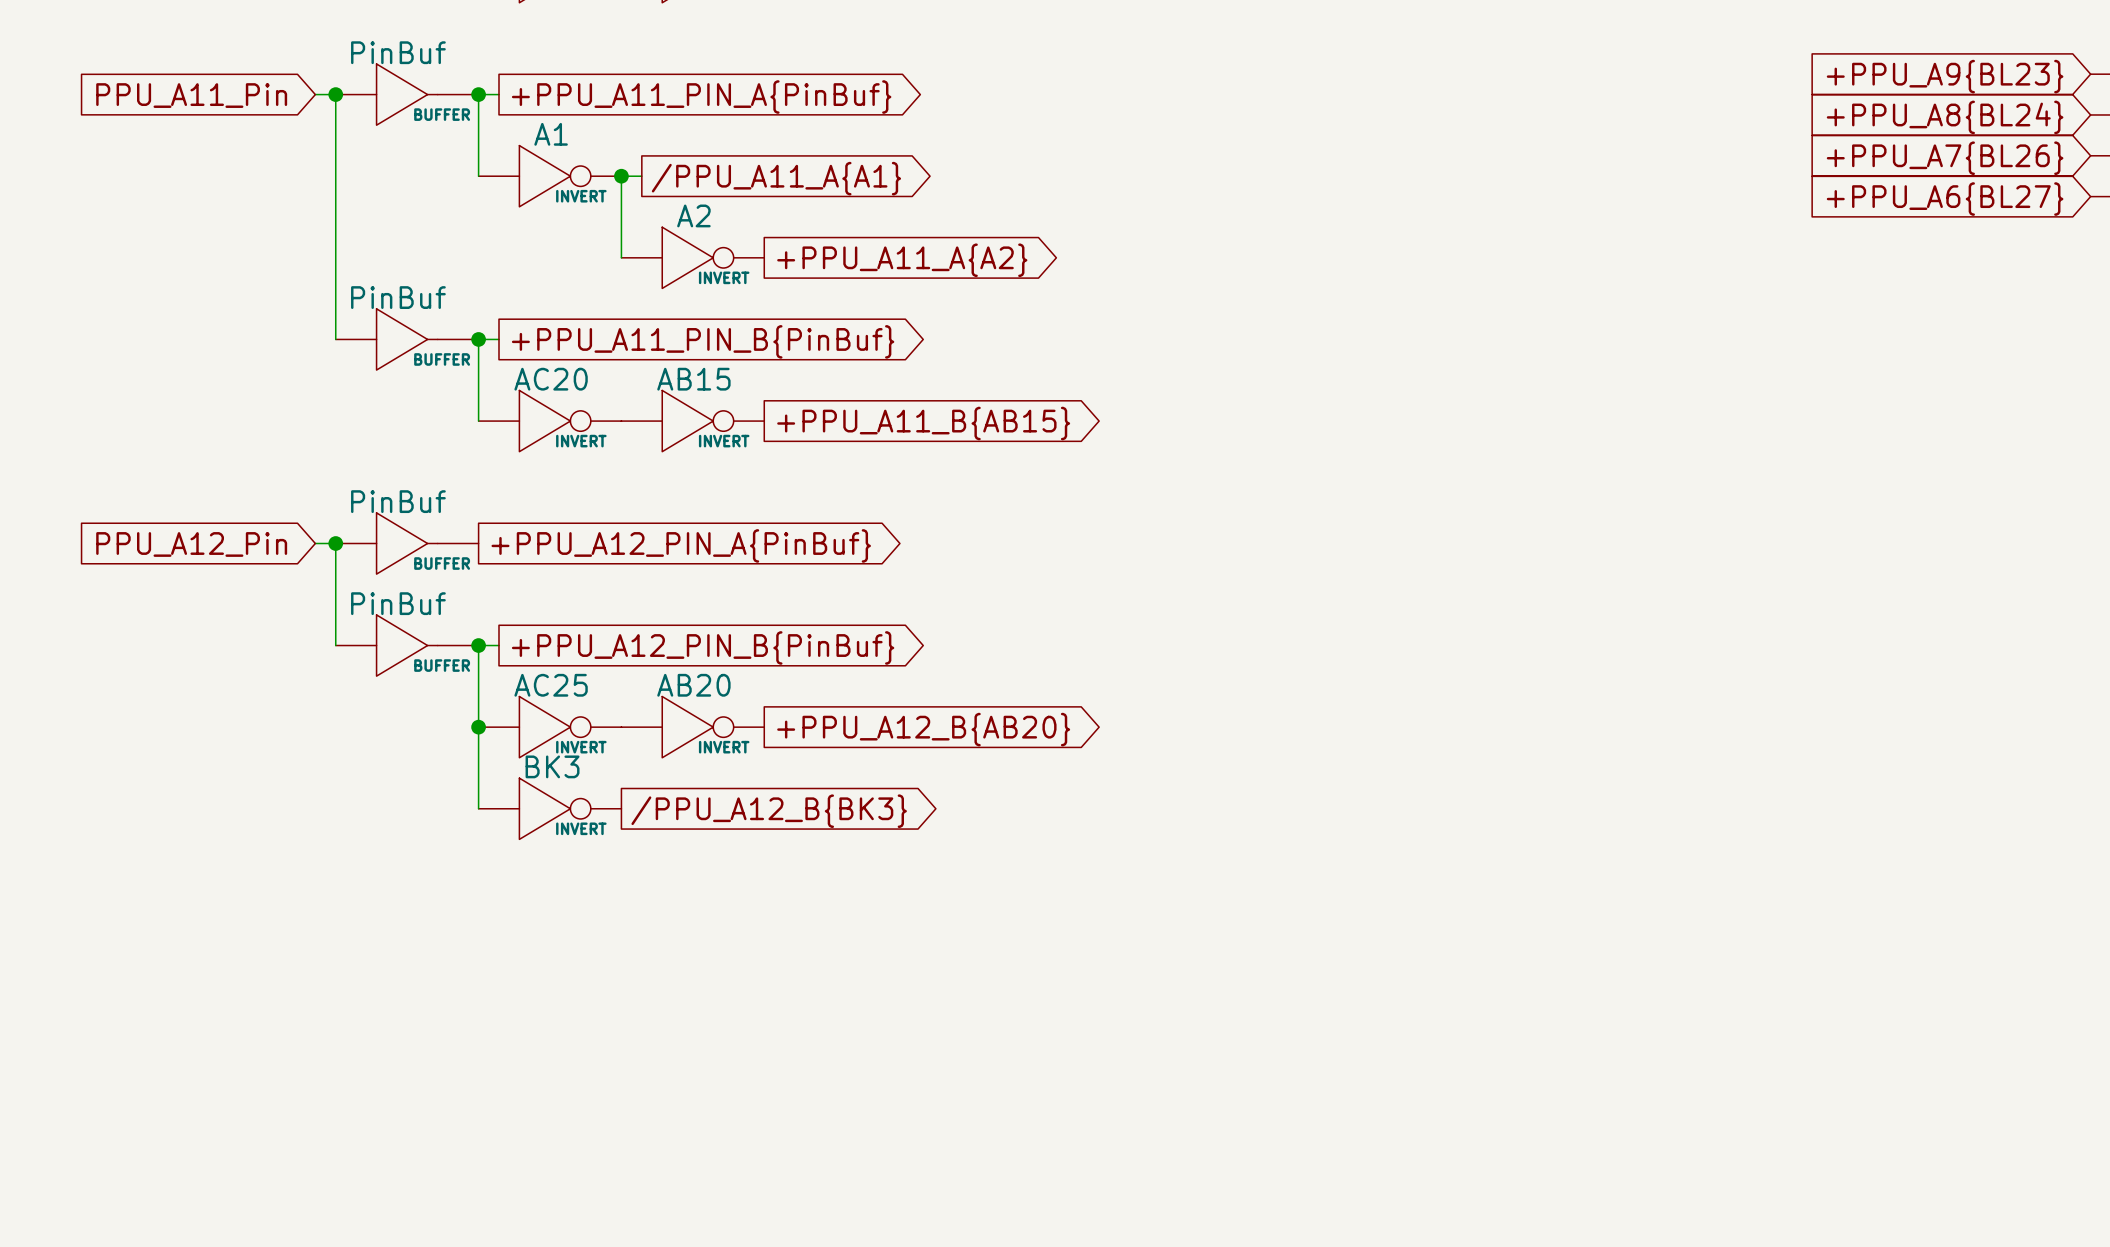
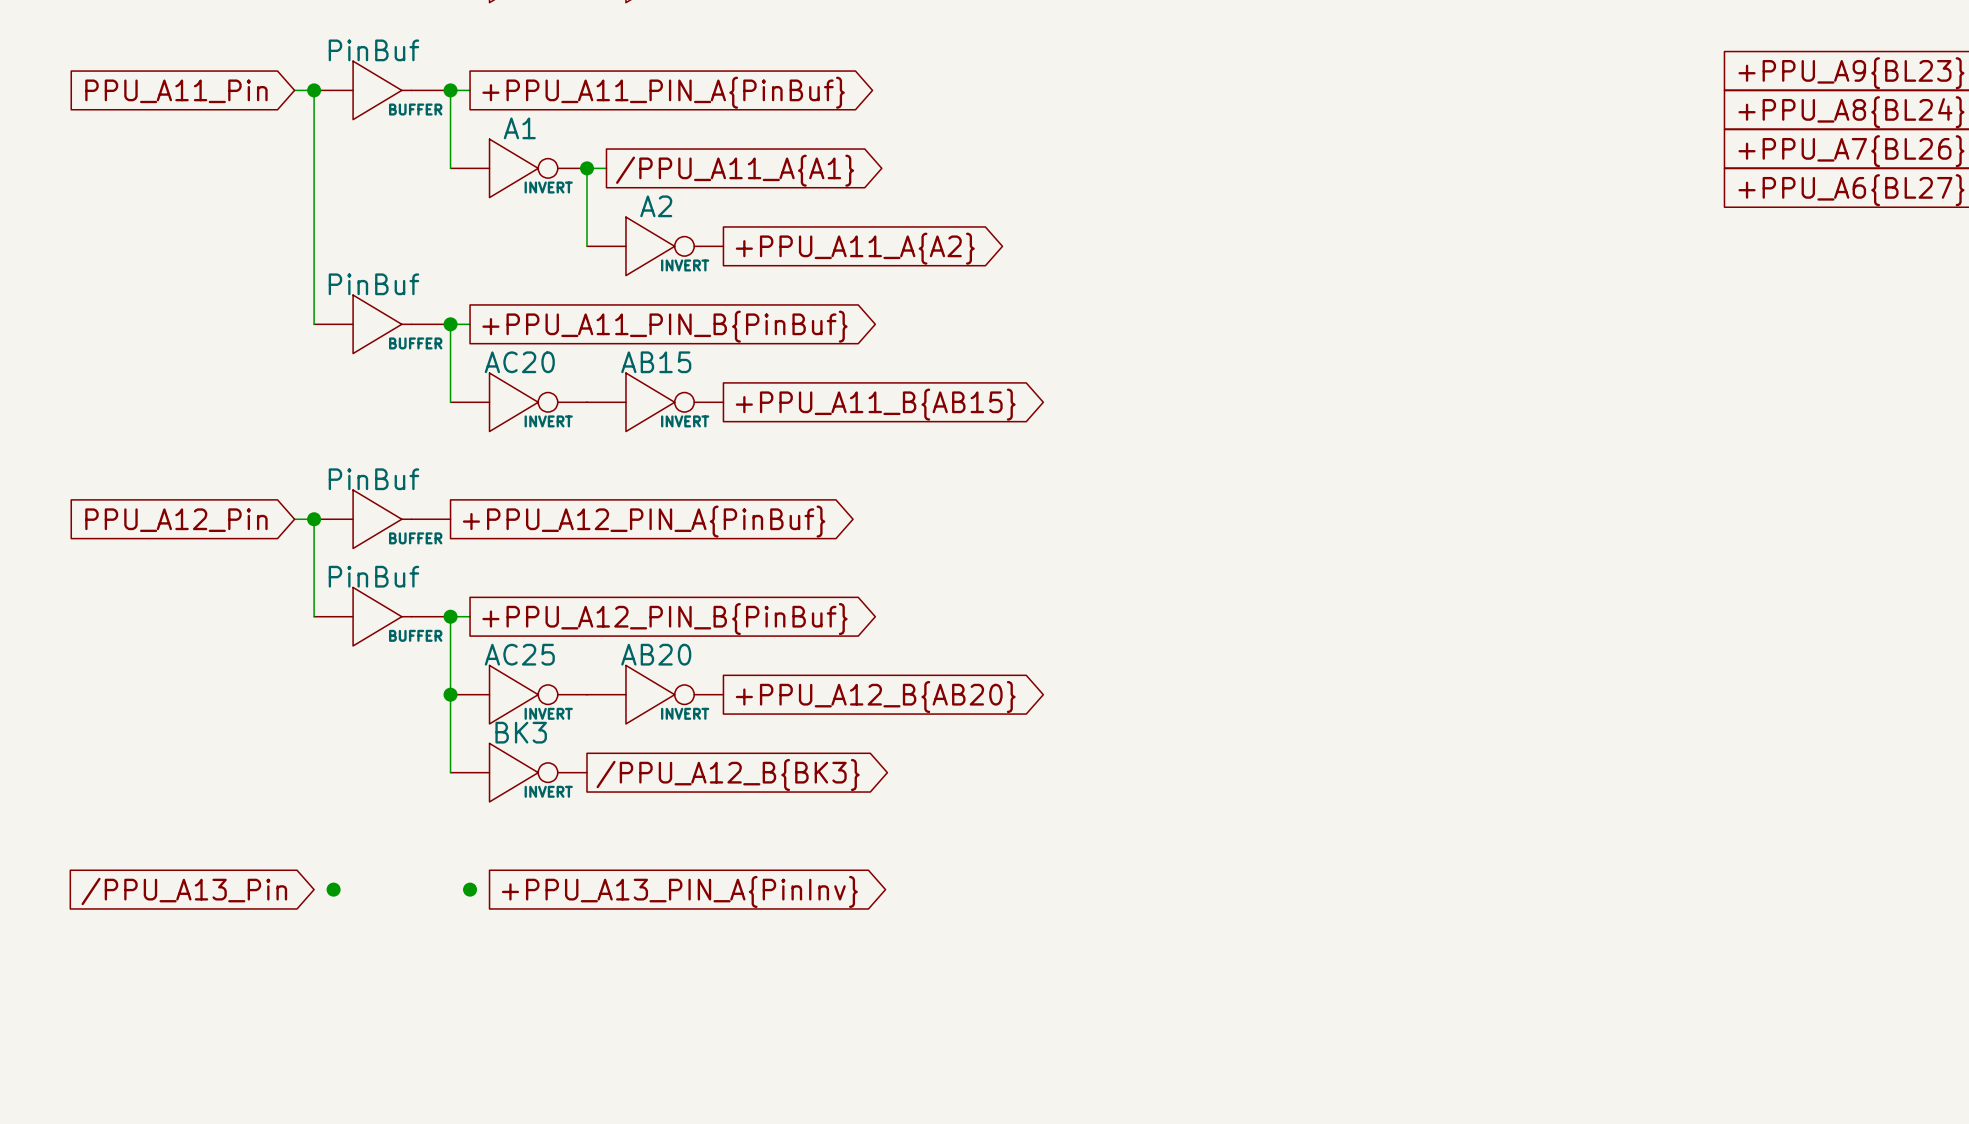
junction: none -> (333, 889)
junction: none -> (470, 889)
global label: none -> /PPU_A13_Pin (184, 891)
global label: none -> +PPU_A13_PIN_A{PinInv} (679, 891)

